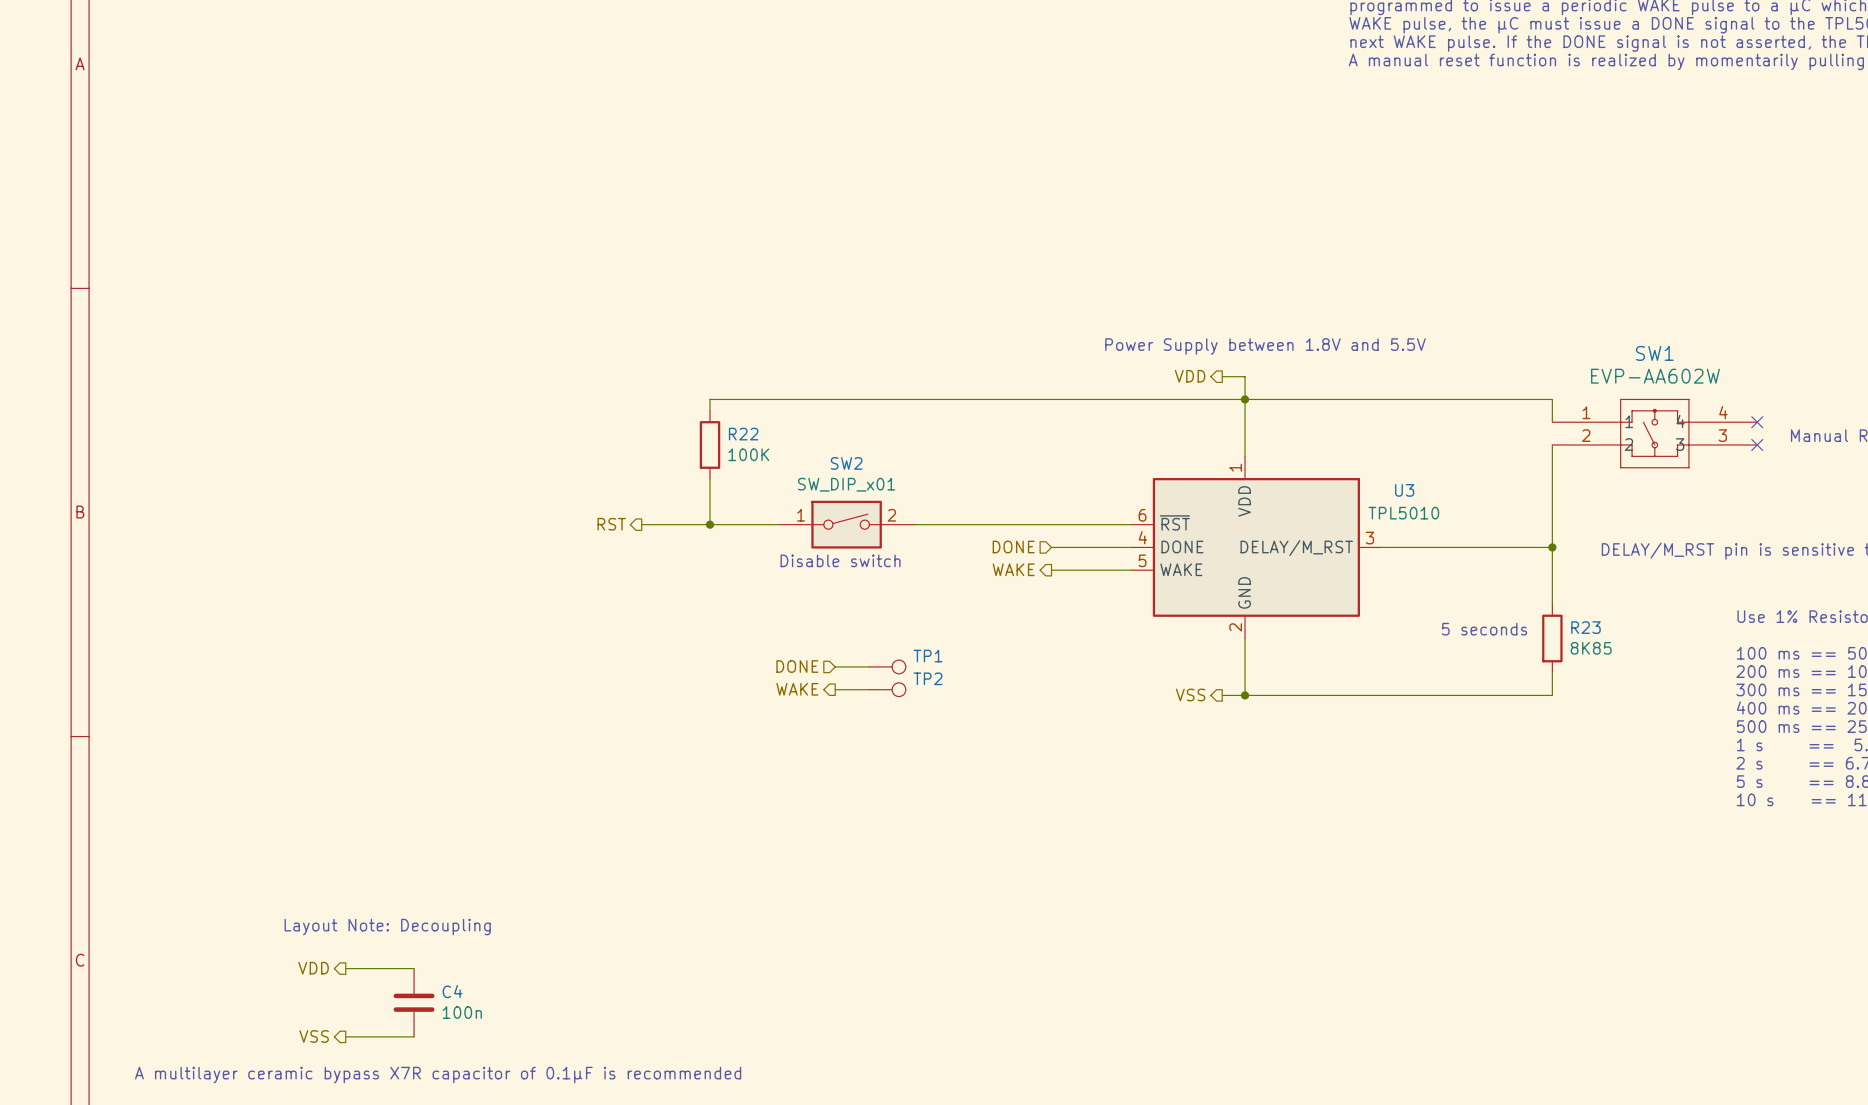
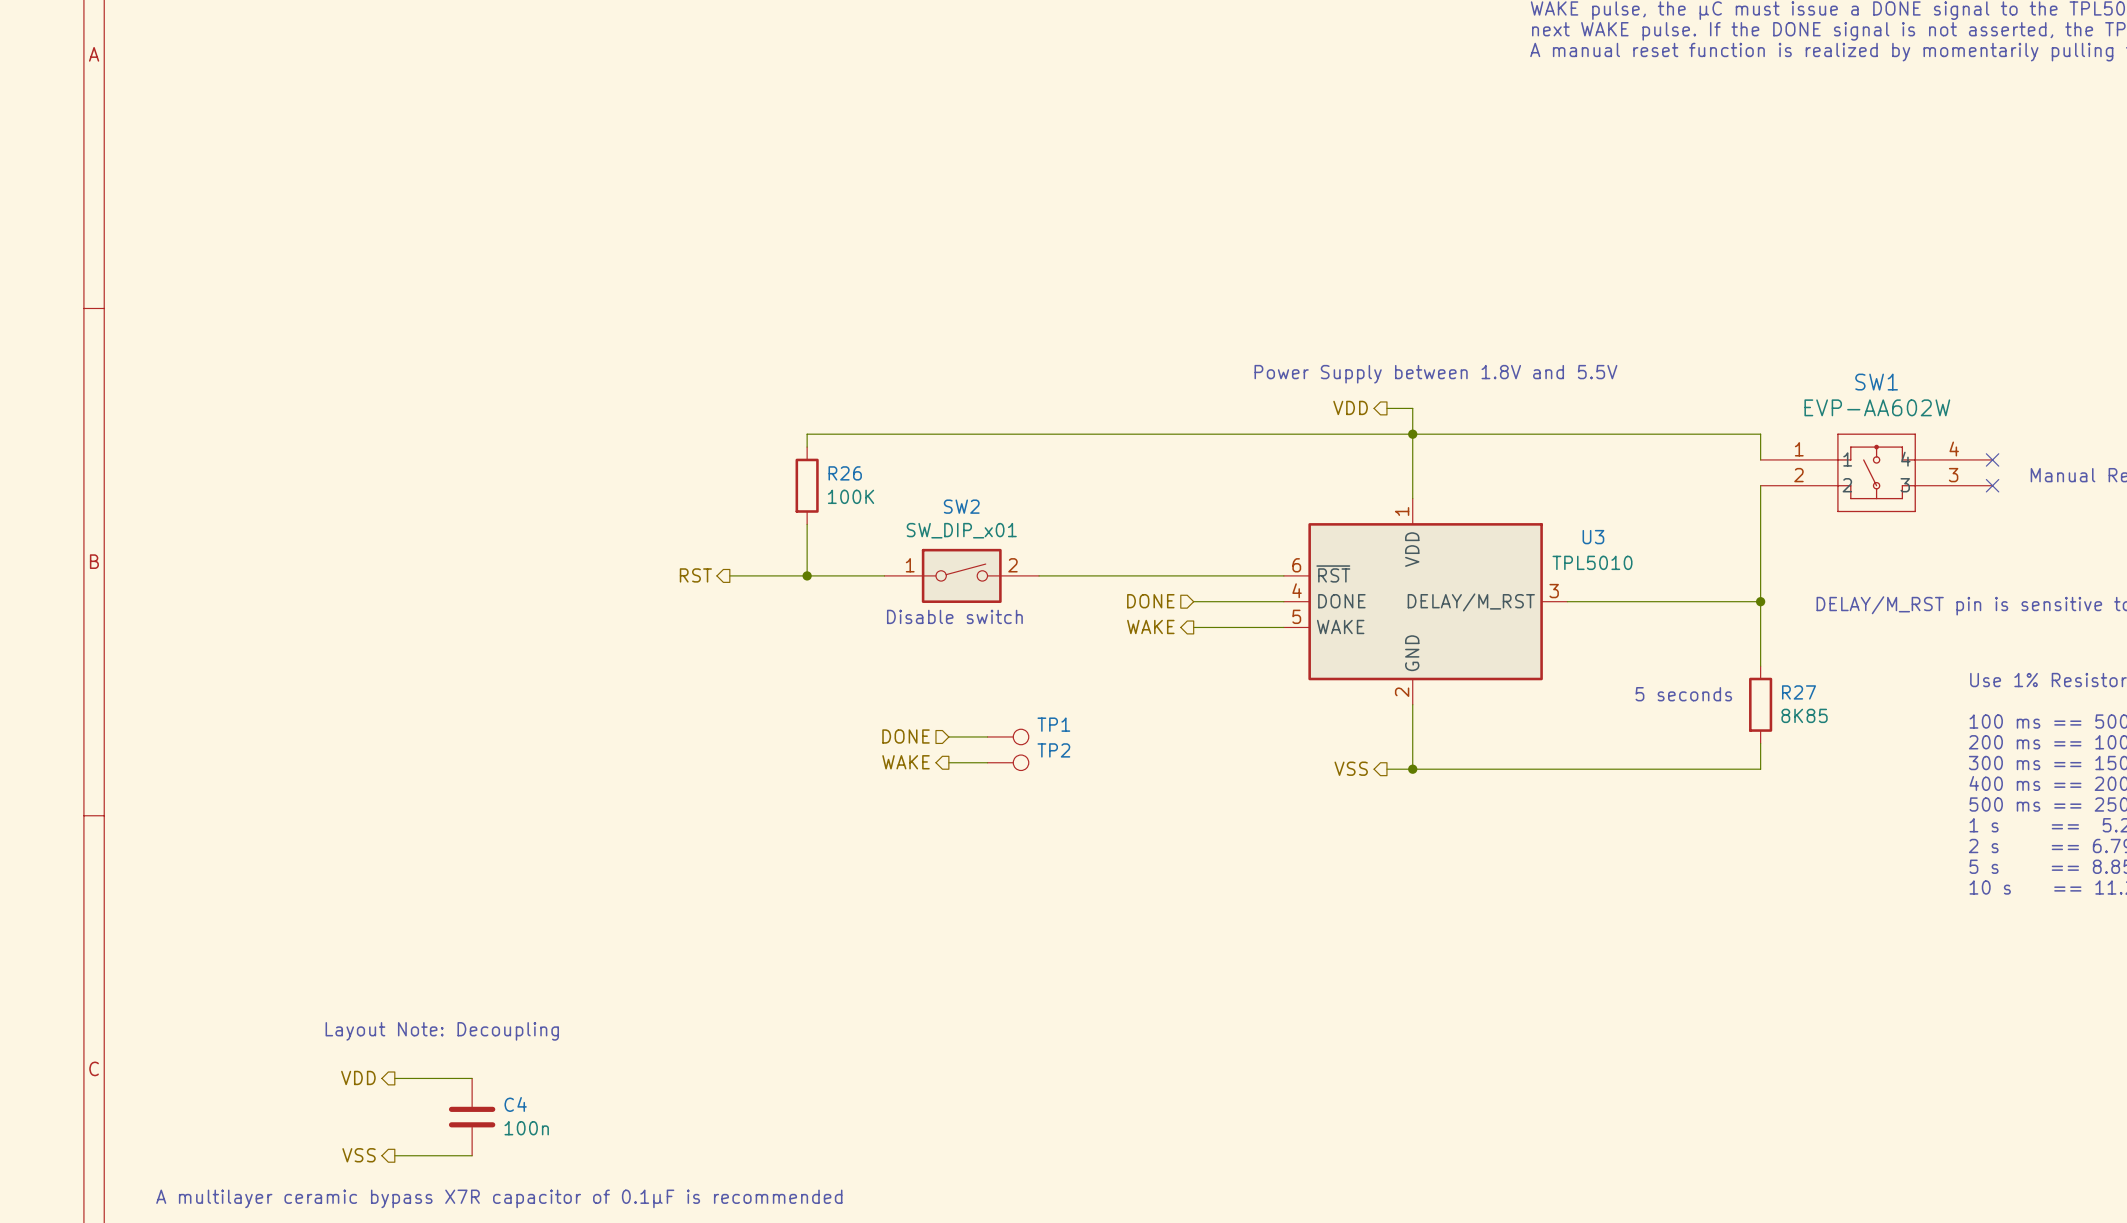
R22 name: R22 (743, 434) -> R26 (845, 473)
R23 name: R23 (1586, 627) -> R27 (1799, 692)

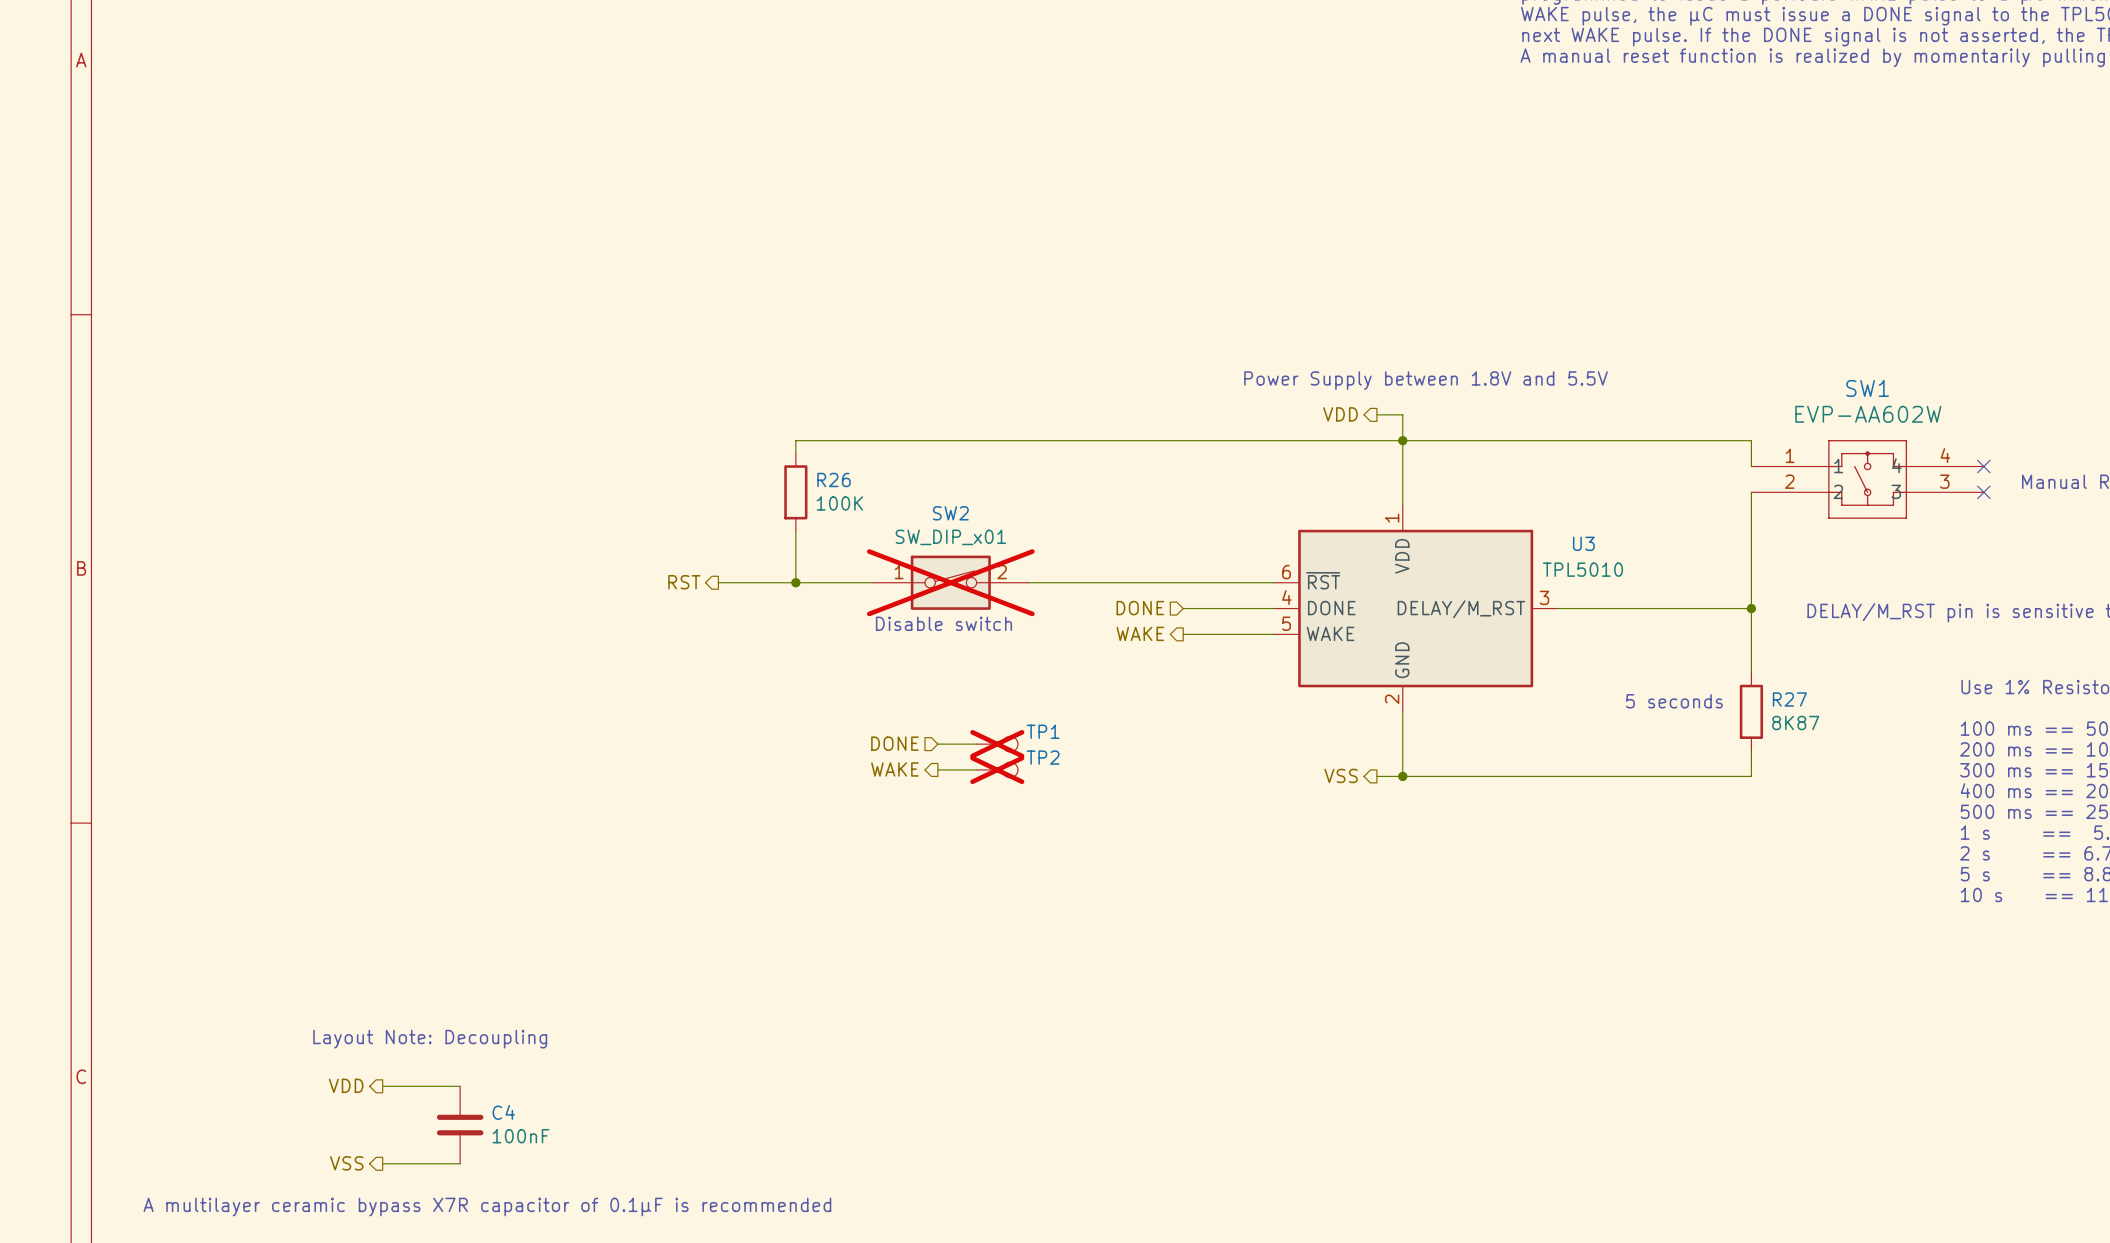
SW2 do-not-place cross: none -> (950, 582)
R27 value: 8K85 (1804, 715) -> 8K87 (1795, 722)
TP1 do-not-place cross: none -> (997, 744)
TP2 do-not-place cross: none -> (997, 769)
C4 value: 100n (526, 1128) -> 100nF (520, 1136)

